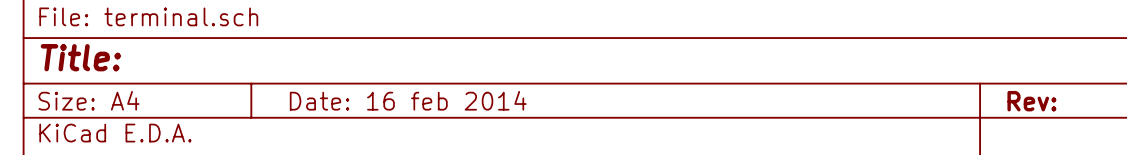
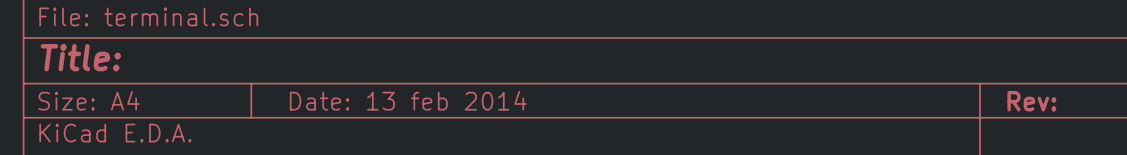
title block: Date: 16 feb 2014 (408, 100) -> Date: 13 feb 2014 (408, 100)

